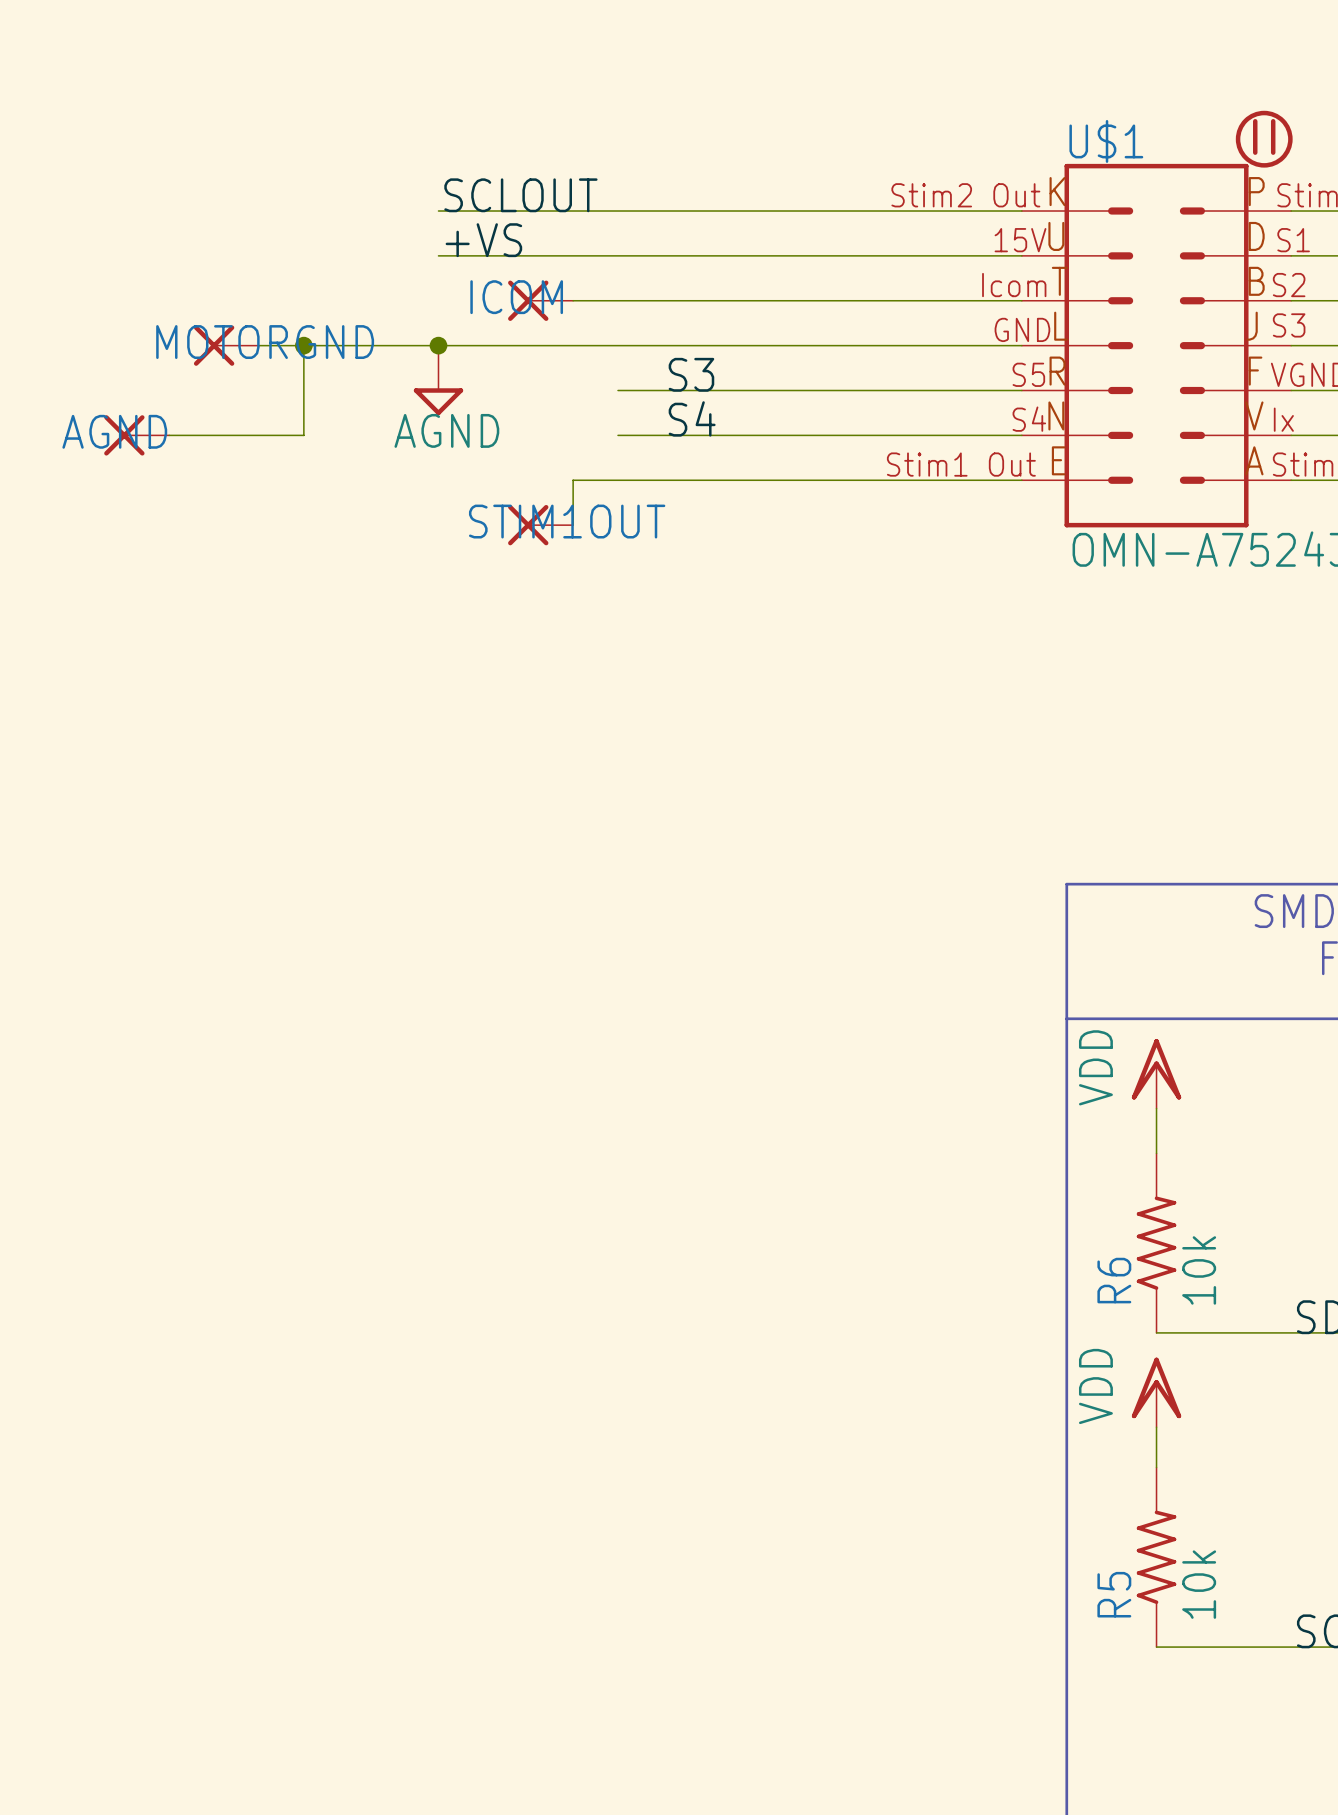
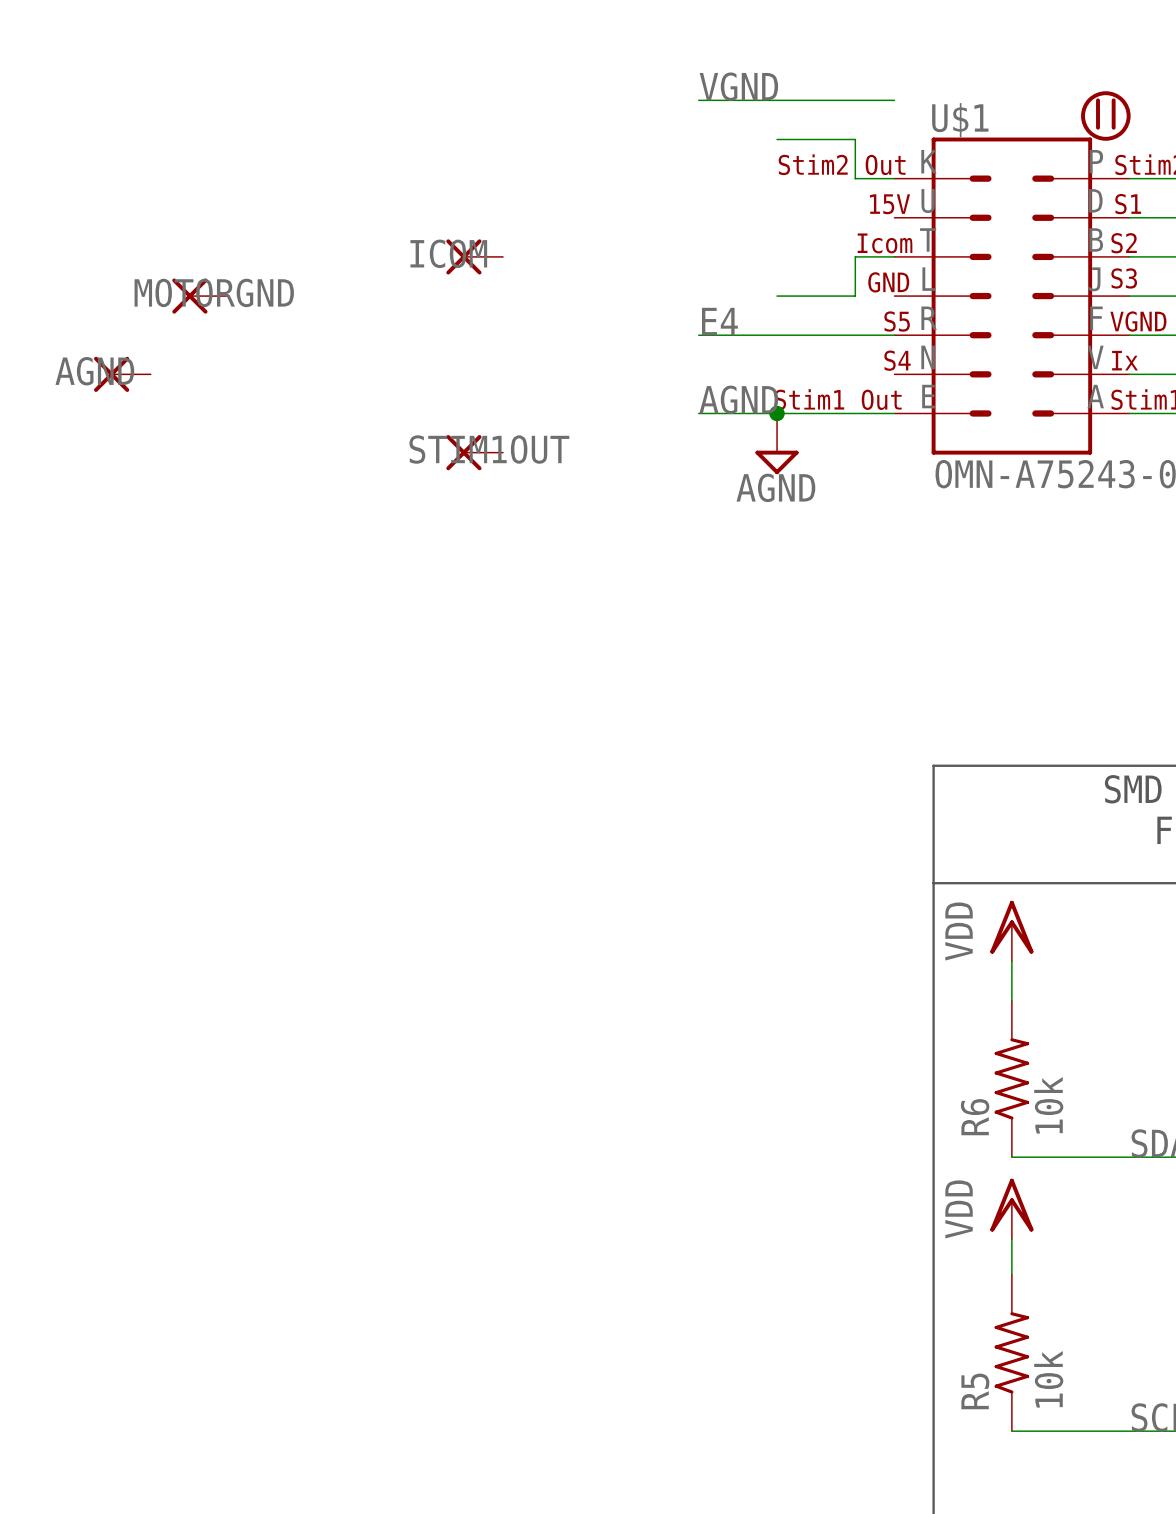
label: none -> VGND (738, 86)
wire: none -> (698, 100) (894, 100)
label: SCLOUT (520, 195) -> none
wire: (438, 211) (977, 211) -> (777, 139) (855, 139) (855, 178)
label: +VS (483, 240) -> none
wire: (438, 255) (1021, 255) -> none
wire: (573, 300) (977, 300) -> none
wire: (258, 345) (887, 345) -> none
wire: (303, 345) (303, 435) (169, 435) -> none
junction: (303, 345) -> none
junction: (438, 345) -> none
wire: (977, 345) (1021, 345) -> (855, 296) (855, 256)
label: S3 (691, 374) -> none
label: none -> E4 (719, 321)
power symbol: AGND (438, 380) -> none
wire: (618, 390) (797, 390) -> none
label: S4 (692, 418) -> none
wire: (618, 435) (1021, 435) -> none
label: none -> AGND (738, 399)
wire: (797, 480) (573, 480) (573, 525) -> none
junction: none -> (777, 413)
power symbol: none -> AGND (777, 443)

